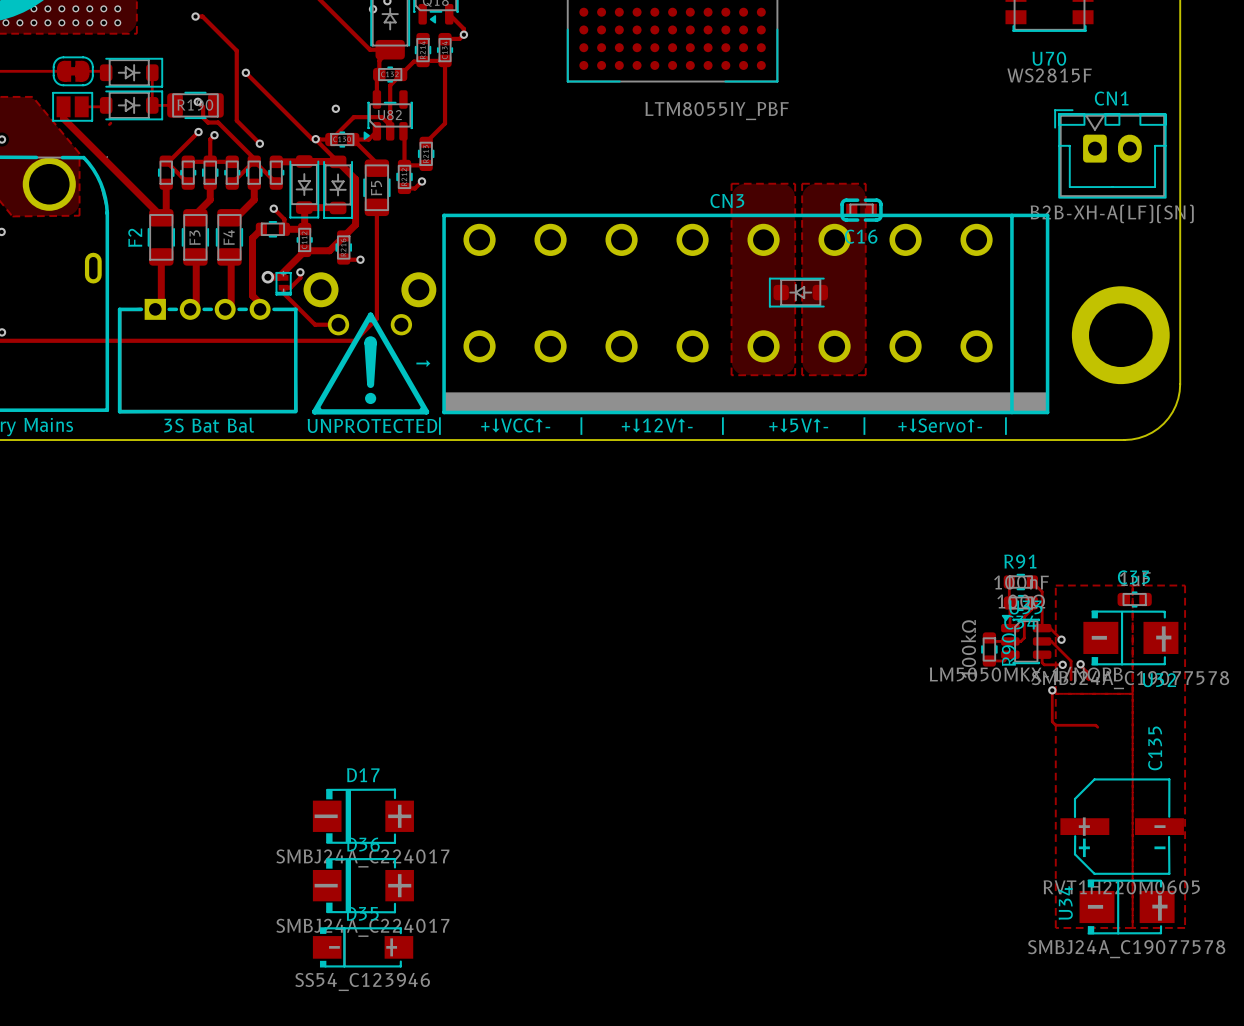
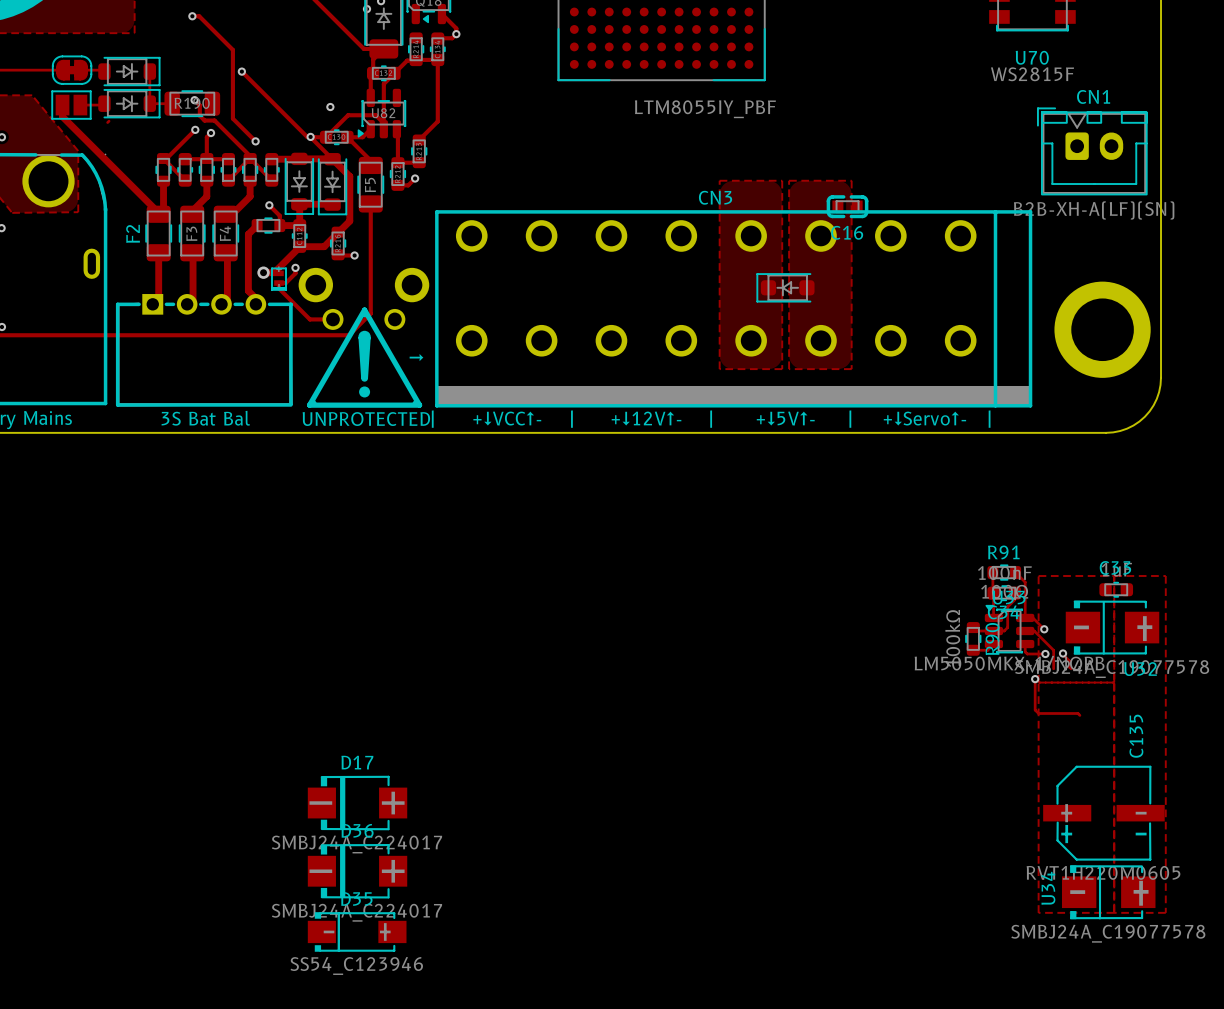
via: (33, 8) -> none
via: (47, 8) -> none
via: (61, 8) -> none
via: (75, 8) -> none
via: (89, 8) -> none
via: (103, 8) -> none
via: (117, 8) -> none
via: (5, 22) -> none
via: (19, 22) -> none
via: (33, 22) -> none
via: (47, 22) -> none
via: (61, 22) -> none
via: (75, 22) -> none
via: (89, 22) -> none
via: (103, 22) -> none
via: (117, 22) -> none

